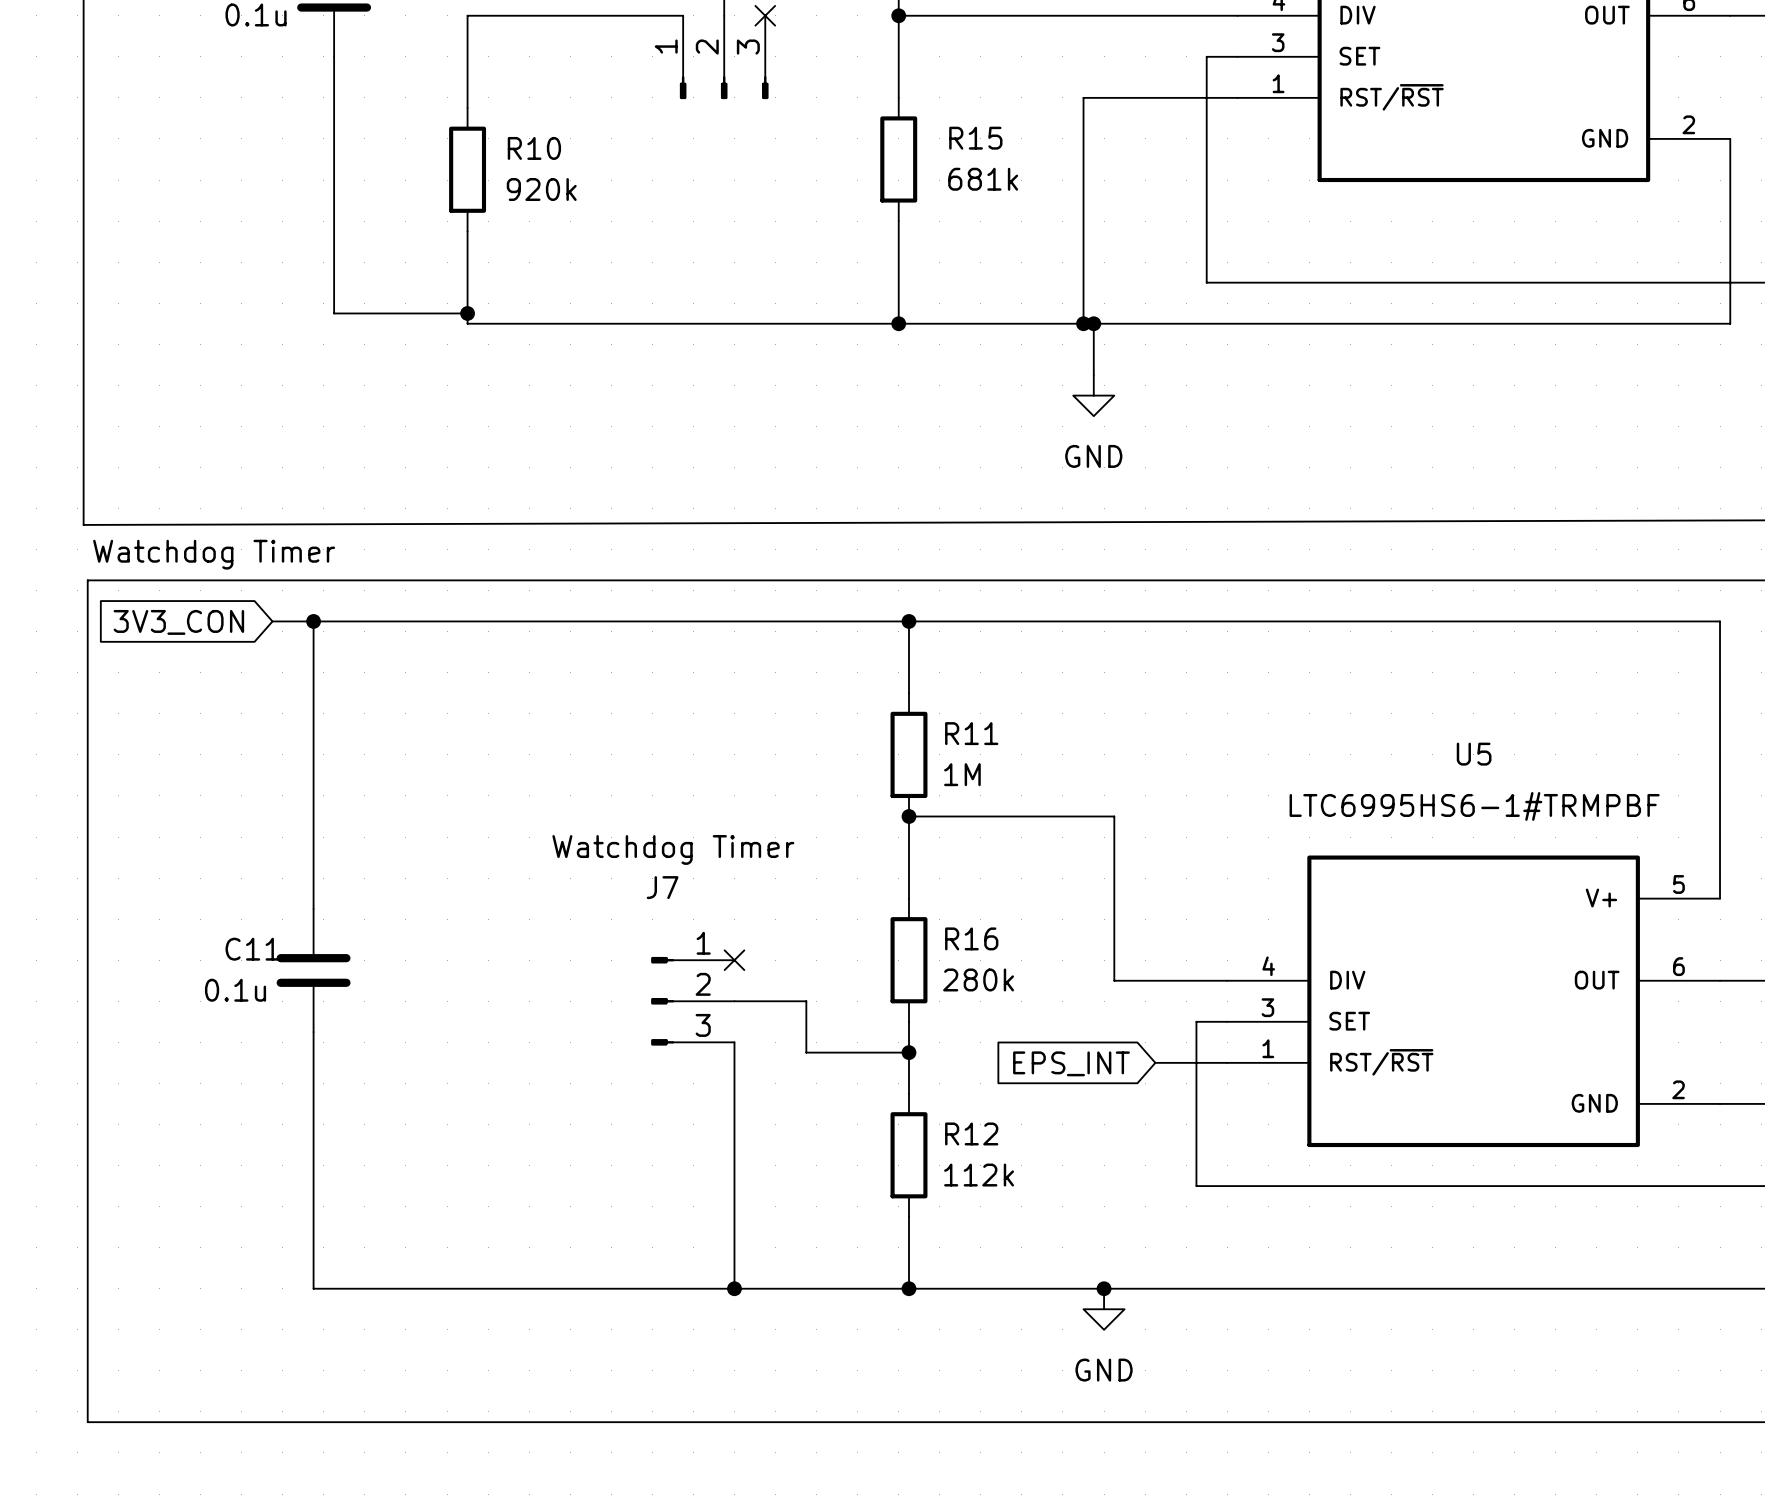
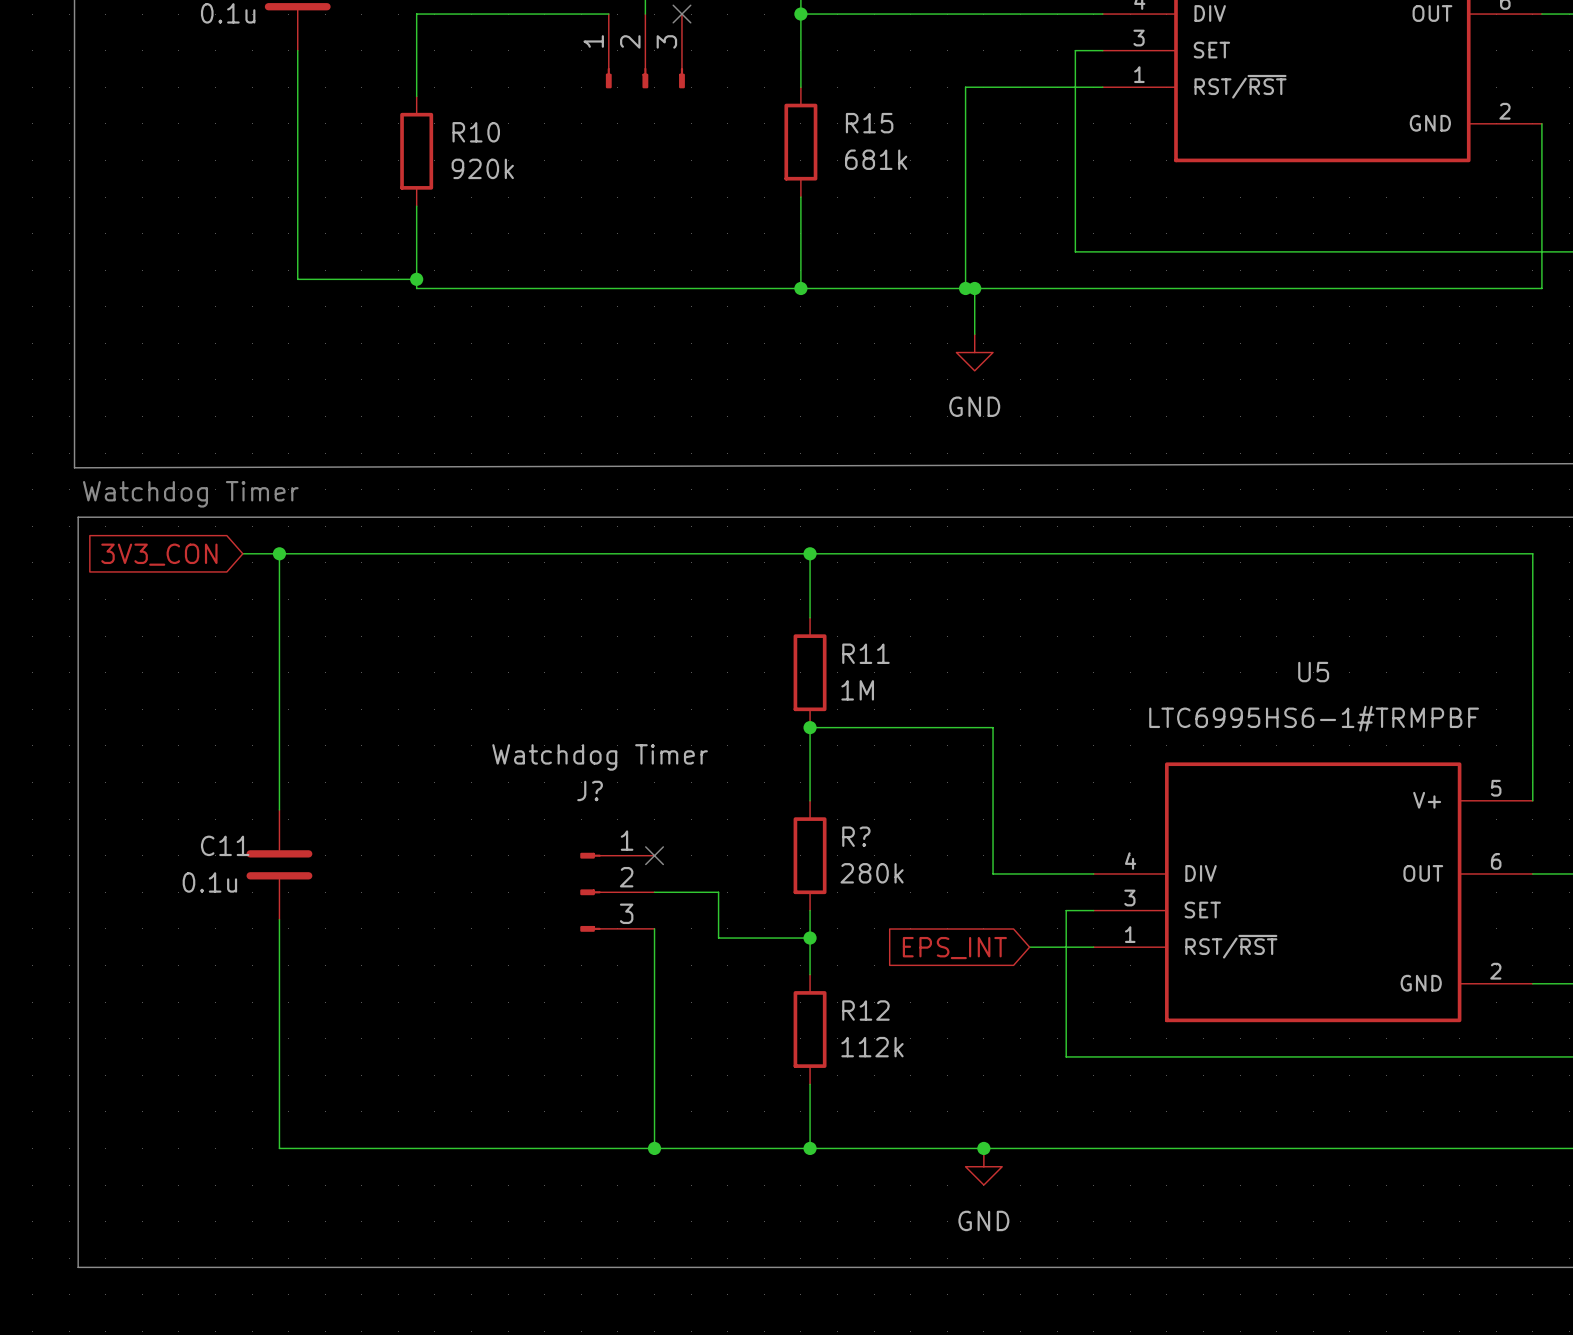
J7 name: J7 (662, 887) -> J? (590, 790)
R16 name: R16 (971, 938) -> R? (856, 836)

